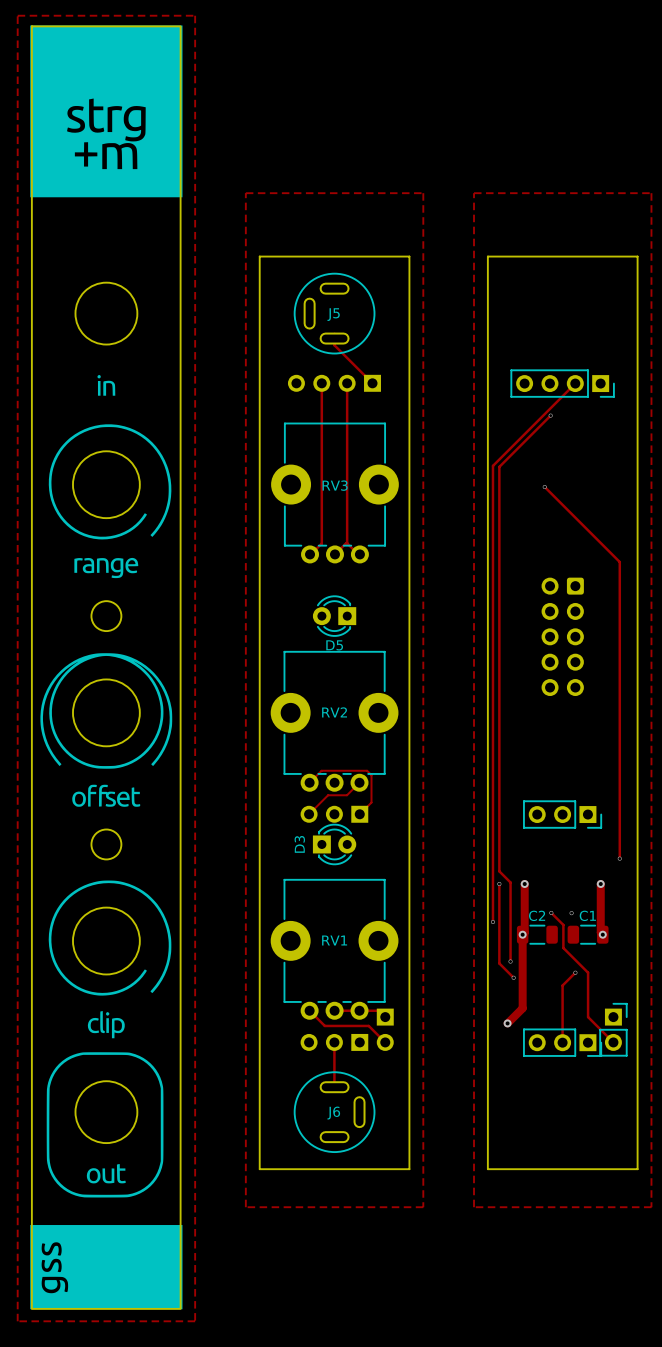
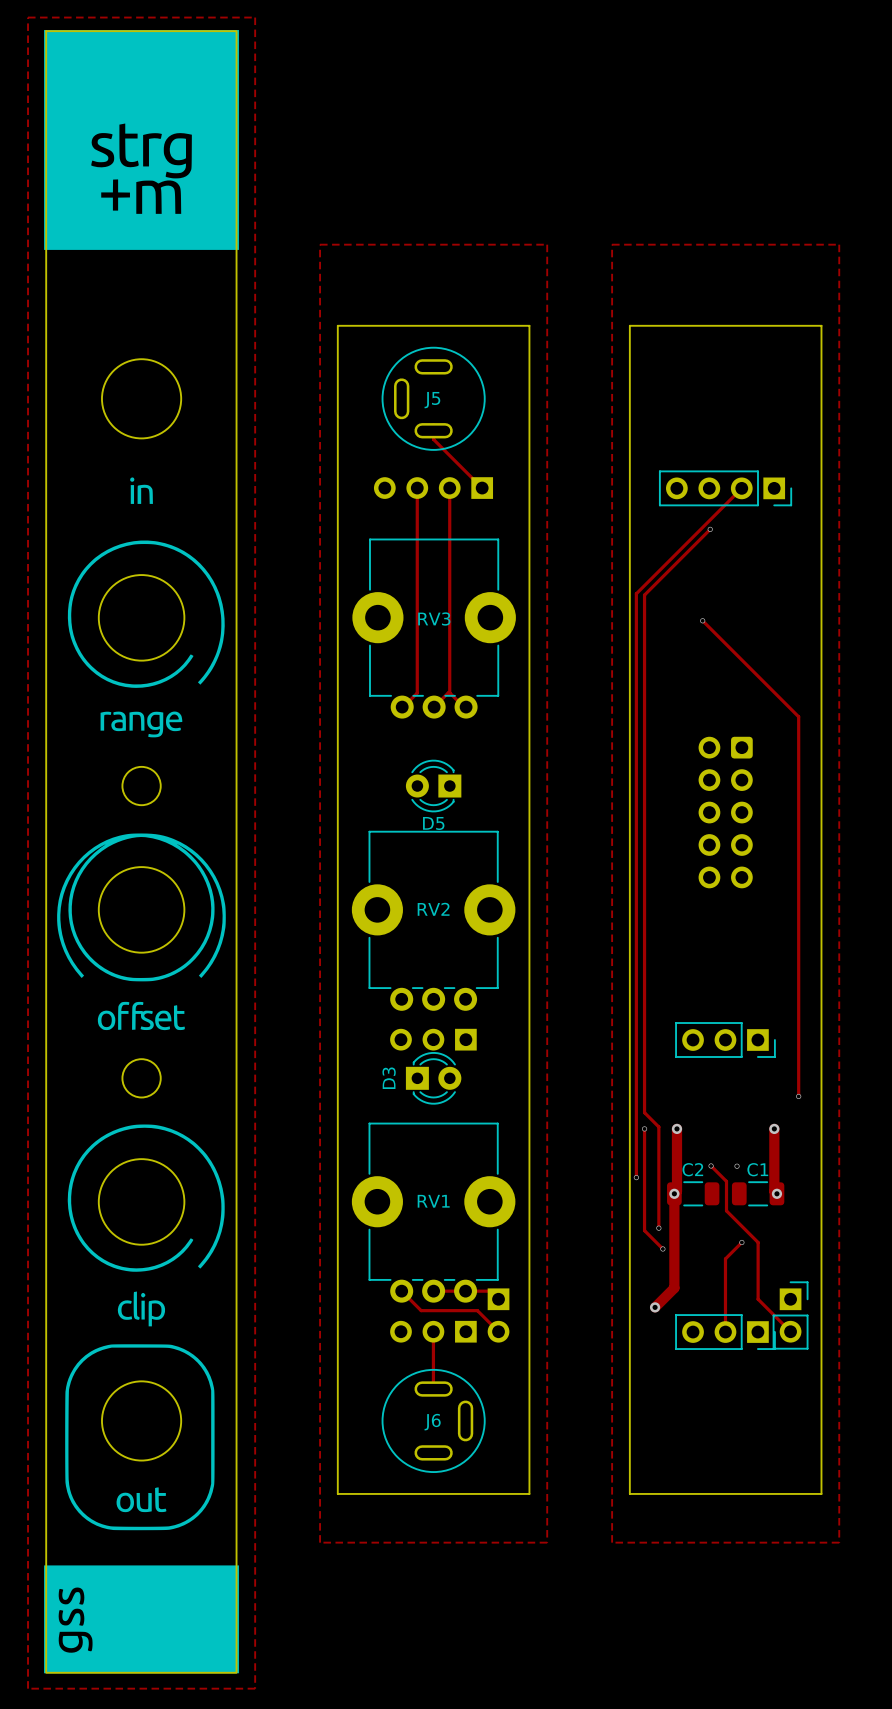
track: (309, 782) (321, 770) (367, 770) (371, 775) (371, 802) (359, 814) -> none
track: (359, 782) (347, 795) (328, 795) (309, 814) -> none

